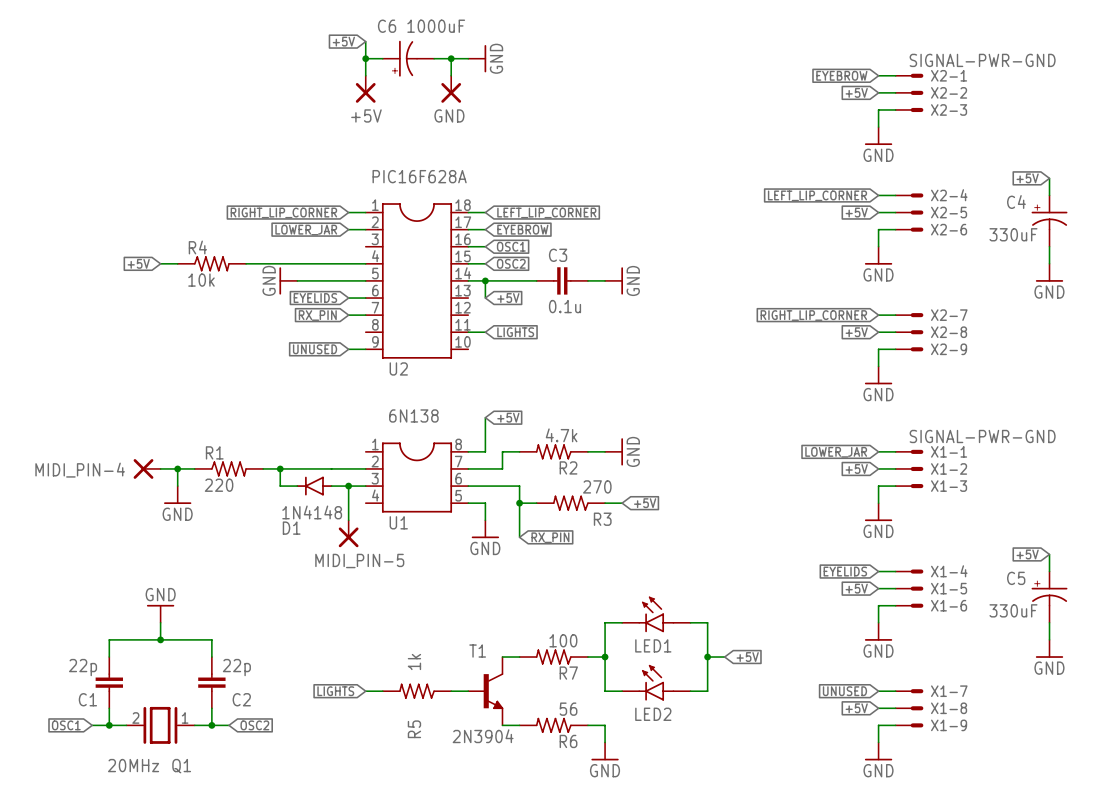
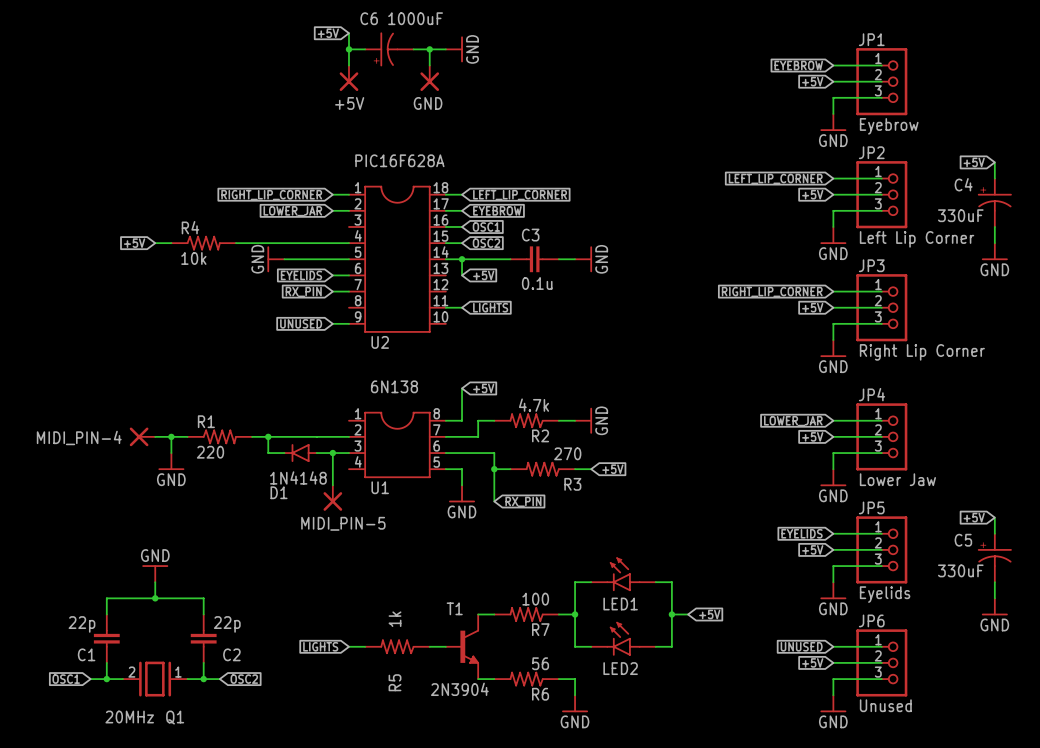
X2-1: SIGNAL-PWR-GND (909, 75) -> none
X2-2: (909, 92) -> none
JP1: none -> Eyebrow (881, 81)
X2-3: (909, 109) -> none
X2-4: (909, 195) -> none
X2-5: (909, 212) -> none
JP2: none -> Left Lip Corner (881, 194)
X2-6: (909, 229) -> none
X2-7: (909, 315) -> none
X2-8: (909, 332) -> none
JP3: none -> Right Lip Corner (881, 307)
X2-9: (909, 349) -> none
X1-1: SIGNAL-PWR-GND (909, 451) -> none
X1-2: (909, 468) -> none
JP4: none -> Lower Jaw (881, 436)
X1-3: (909, 486) -> none
X1-4: (909, 571) -> none
X1-5: (909, 588) -> none
JP5: none -> Eyelids (881, 549)
X1-6: (909, 605) -> none
X1-7: (909, 691) -> none
X1-8: (909, 708) -> none
JP6: none -> Unused (881, 662)
X1-9: (909, 725) -> none

